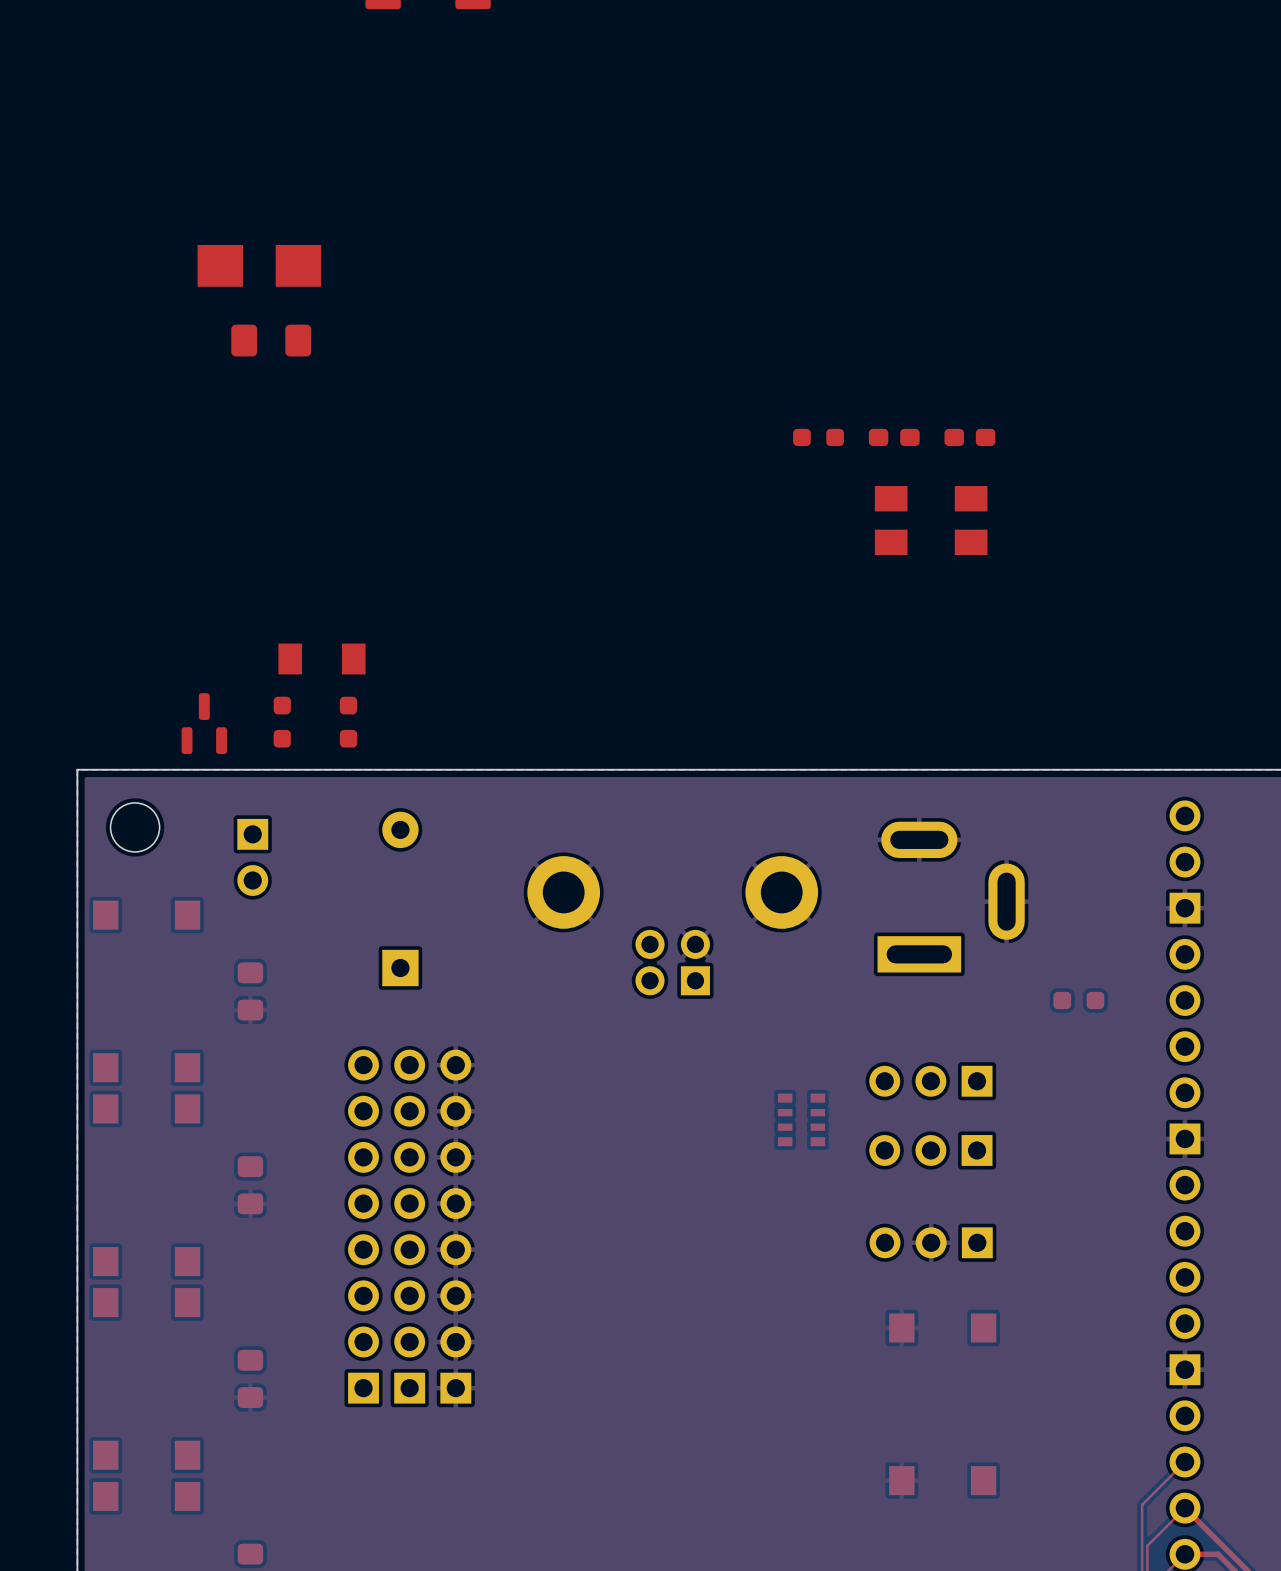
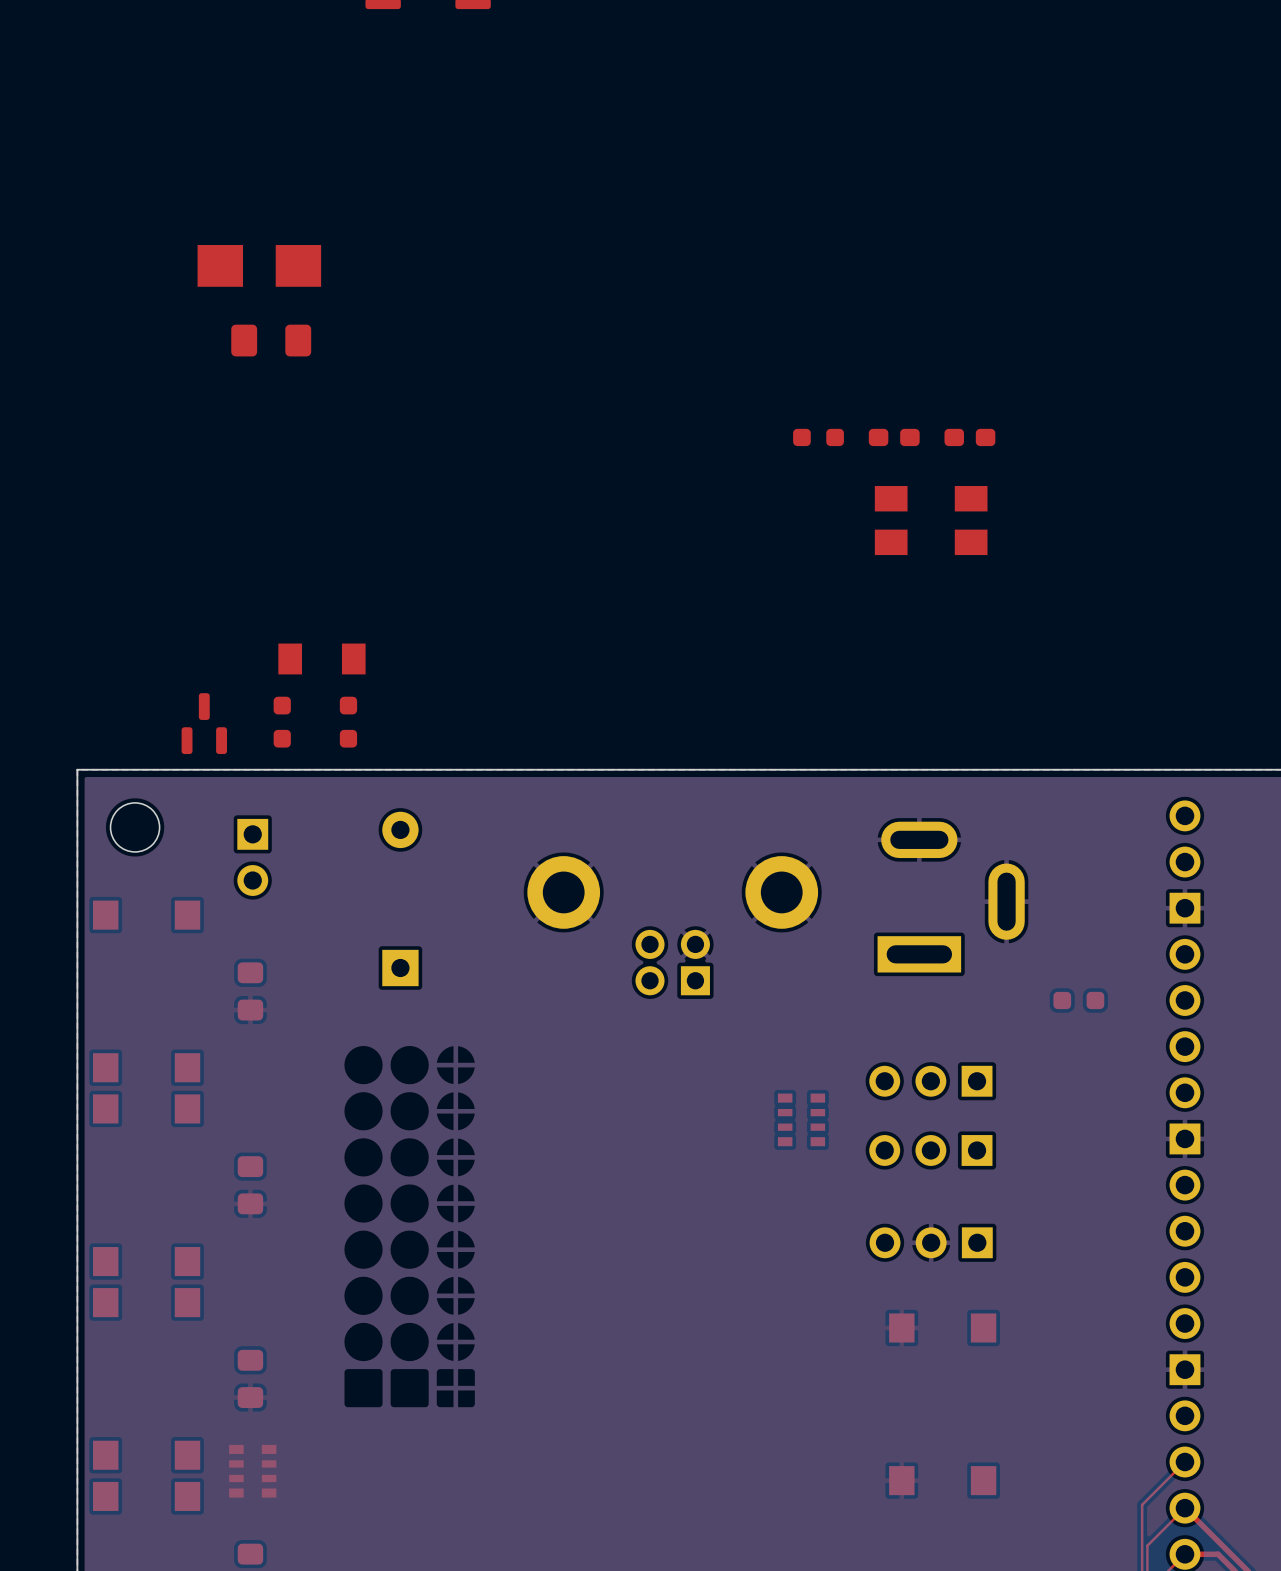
part: (363, 1226) -> none
part: (409, 1226) -> none
part: (455, 1226) -> none
part: none -> (252, 1471)

